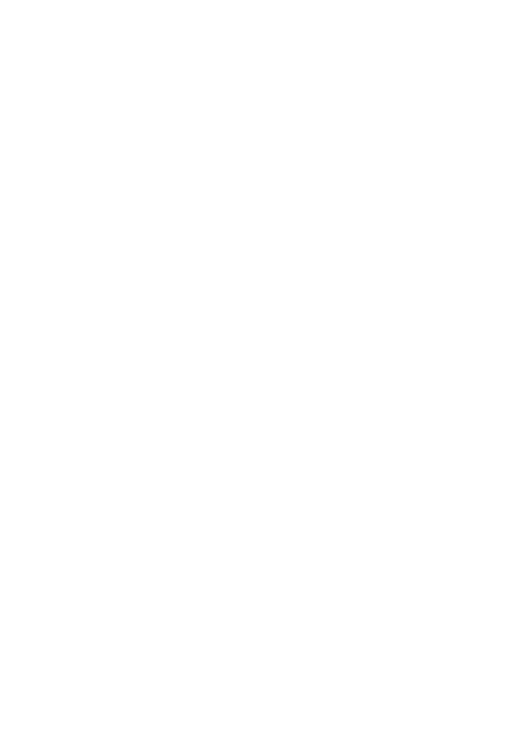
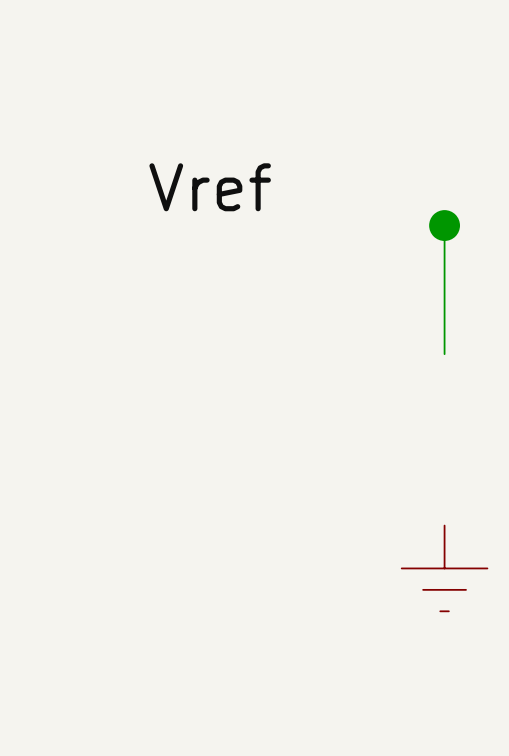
label: none -> Vref (210, 187)
wire: none -> (444, 225) (444, 354)
junction: none -> (444, 225)
power symbol: none -> (444, 568)

